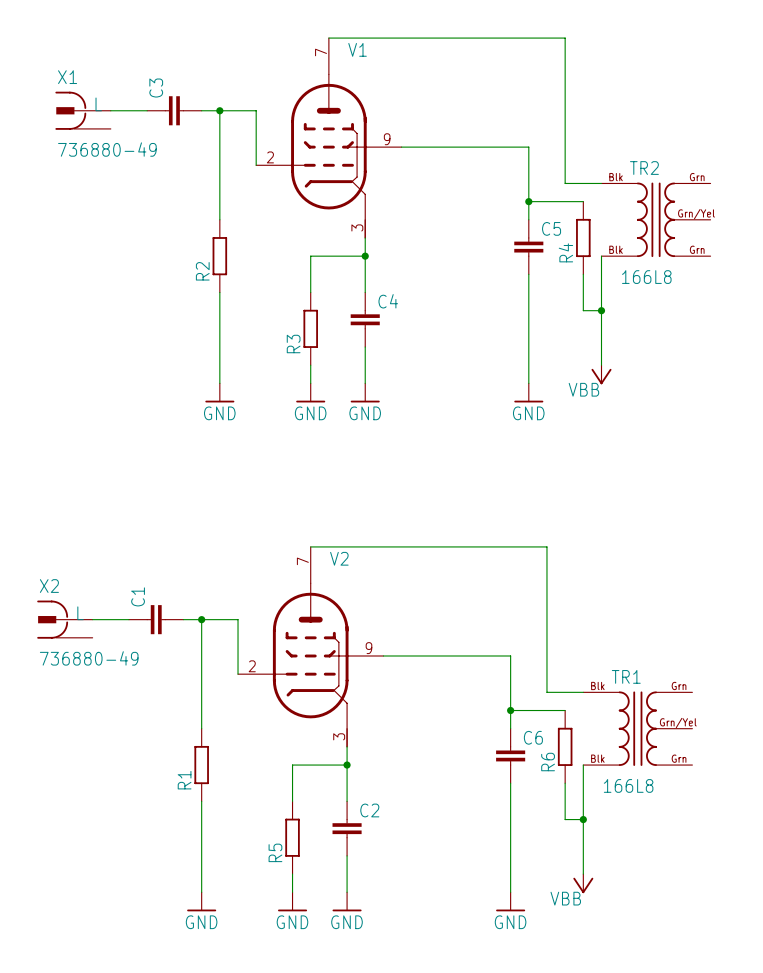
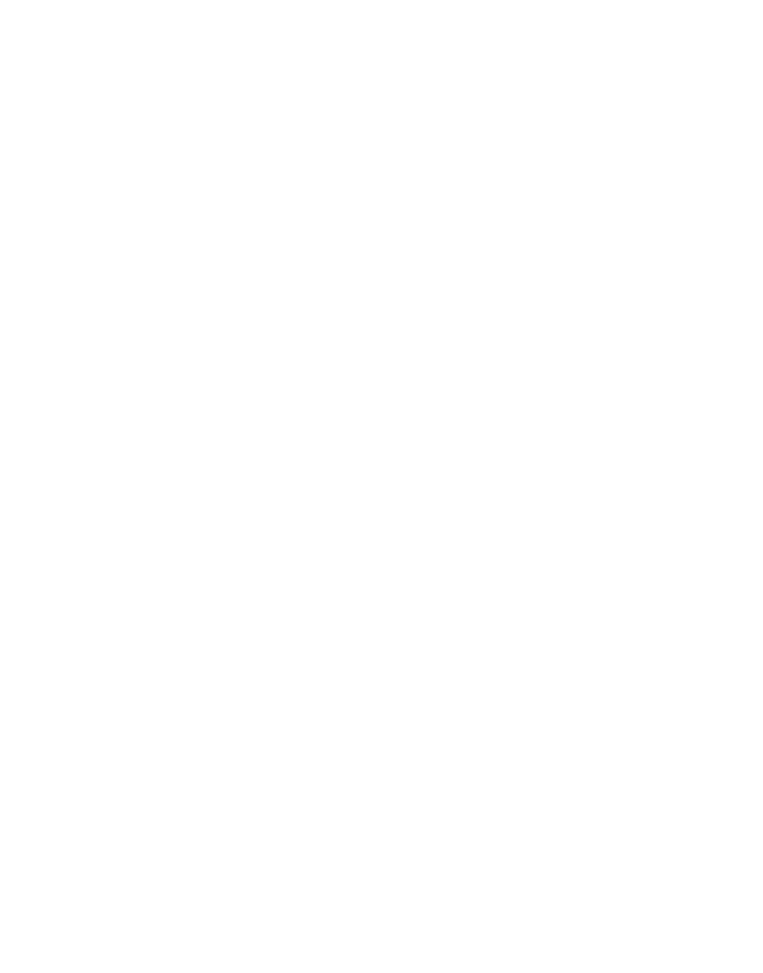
wire: (328, 38) (565, 38) (565, 183) (601, 183) -> none
X1: 736880-49 (83, 110) -> none
wire: (110, 110) (147, 110) -> none
C3: (174, 110) -> none
wire: (201, 110) (256, 110) (256, 165) -> none
wire: (219, 110) (219, 219) -> none
junction: (219, 110) -> none
V1: (328, 138) -> none
wire: (401, 147) (528, 147) (528, 219) -> none
wire: (528, 201) (583, 201) -> none
junction: (528, 201) -> none
TR2: 166L8 (656, 219) -> none
wire: (365, 237) (365, 292) -> none
R4: (583, 237) -> none
C5: (528, 247) -> none
R2: (219, 256) -> none
wire: (365, 256) (310, 256) (310, 292) -> none
junction: (365, 256) -> none
wire: (601, 256) (601, 365) -> none
wire: (528, 274) (528, 383) -> none
wire: (583, 274) (583, 310) (601, 310) -> none
wire: (219, 292) (219, 383) -> none
junction: (601, 310) -> none
C4: (365, 319) -> none
R3: (310, 328) -> none
wire: (365, 347) (365, 383) -> none
wire: (310, 365) (310, 383) -> none
power symbol: (601, 374) -> none
power symbol: GND (219, 392) -> none
power symbol: GND (310, 392) -> none
power symbol: GND (365, 392) -> none
power symbol: GND (528, 392) -> none
wire: (310, 546) (546, 546) (546, 692) (583, 692) -> none
X2: 736880-49 (64, 619) -> none
wire: (92, 619) (128, 619) -> none
C1: (156, 619) -> none
wire: (183, 619) (238, 619) (238, 674) -> none
wire: (201, 619) (201, 728) -> none
junction: (201, 619) -> none
V2: (310, 647) -> none
wire: (383, 655) (510, 655) (510, 728) -> none
wire: (510, 710) (565, 710) -> none
junction: (510, 710) -> none
TR1: 166L8 (637, 728) -> none
wire: (347, 746) (347, 801) -> none
R6: (565, 746) -> none
C6: (510, 755) -> none
R1: (201, 765) -> none
wire: (347, 765) (292, 765) (292, 801) -> none
junction: (347, 765) -> none
wire: (583, 765) (583, 874) -> none
wire: (510, 783) (510, 892) -> none
wire: (565, 783) (565, 819) (583, 819) -> none
wire: (201, 801) (201, 892) -> none
junction: (583, 819) -> none
C2: (347, 828) -> none
R5: (292, 837) -> none
wire: (347, 855) (347, 892) -> none
wire: (292, 874) (292, 892) -> none
power symbol: (583, 883) -> none
power symbol: GND (201, 901) -> none
power symbol: GND (292, 901) -> none
power symbol: GND (347, 901) -> none
power symbol: GND (510, 901) -> none

